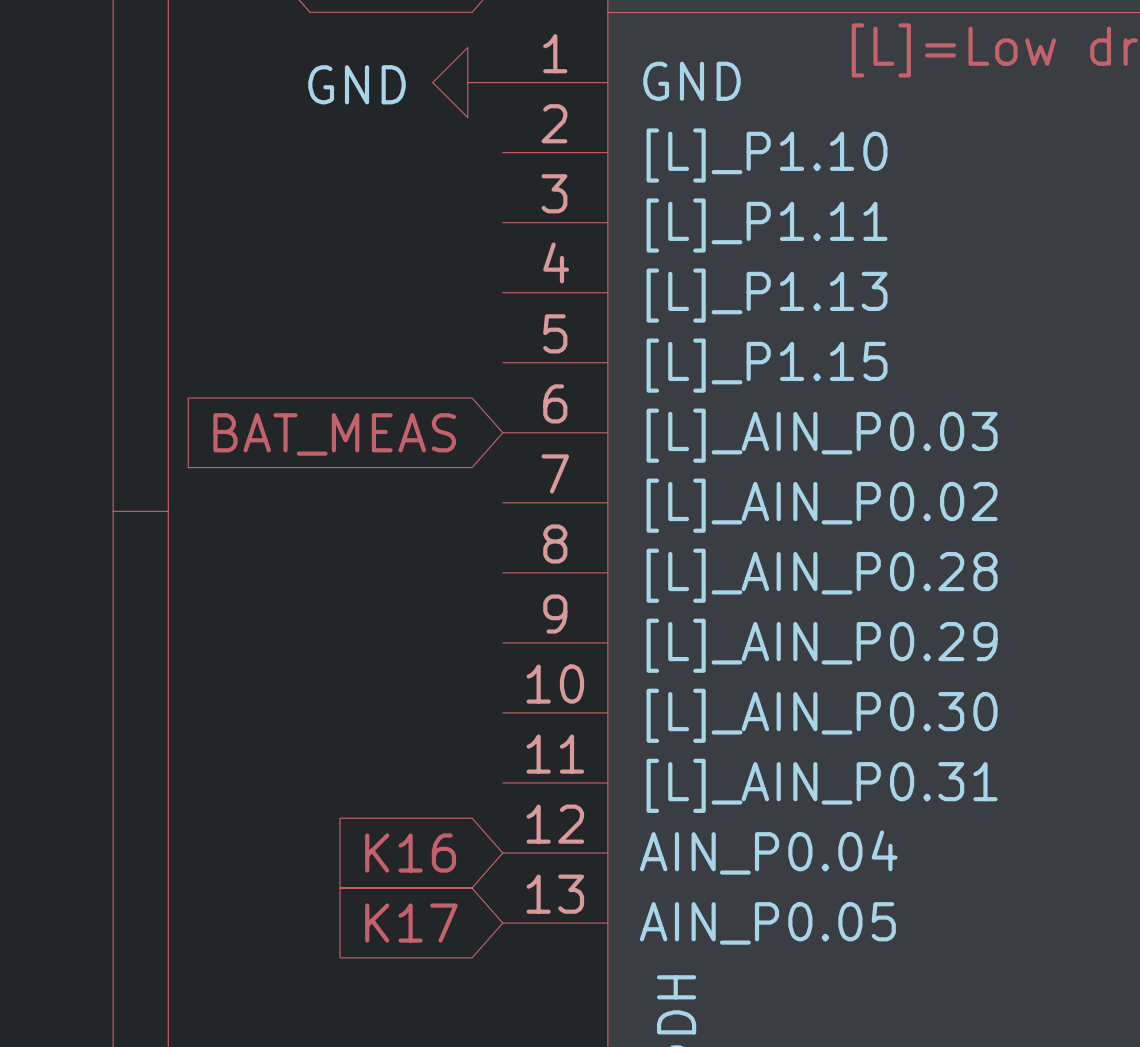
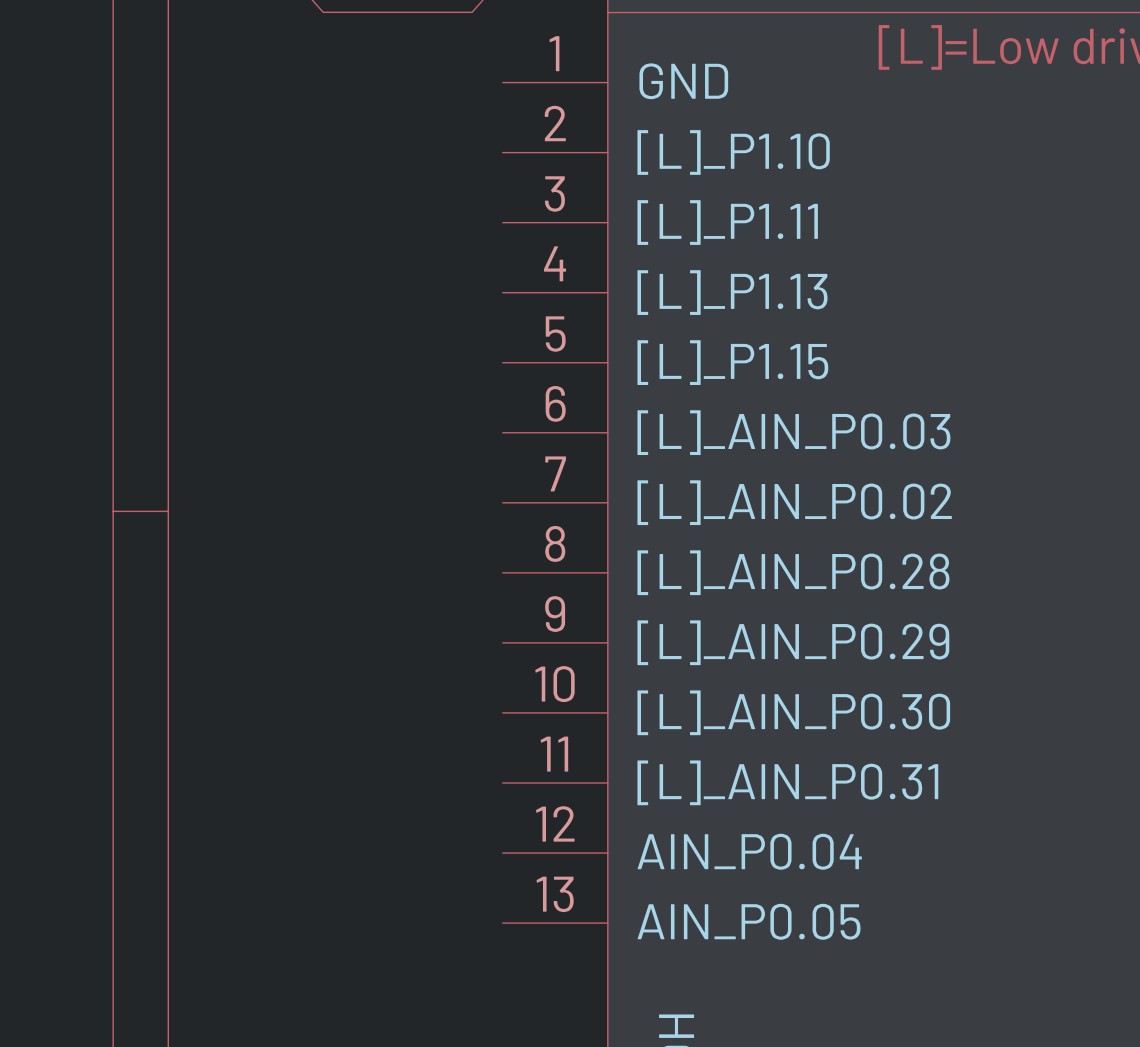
power symbol: GND (467, 82) -> none
global label: BAT_MEAS (334, 434) -> none
global label: K16 (410, 853) -> none
global label: K17 (411, 923) -> none

